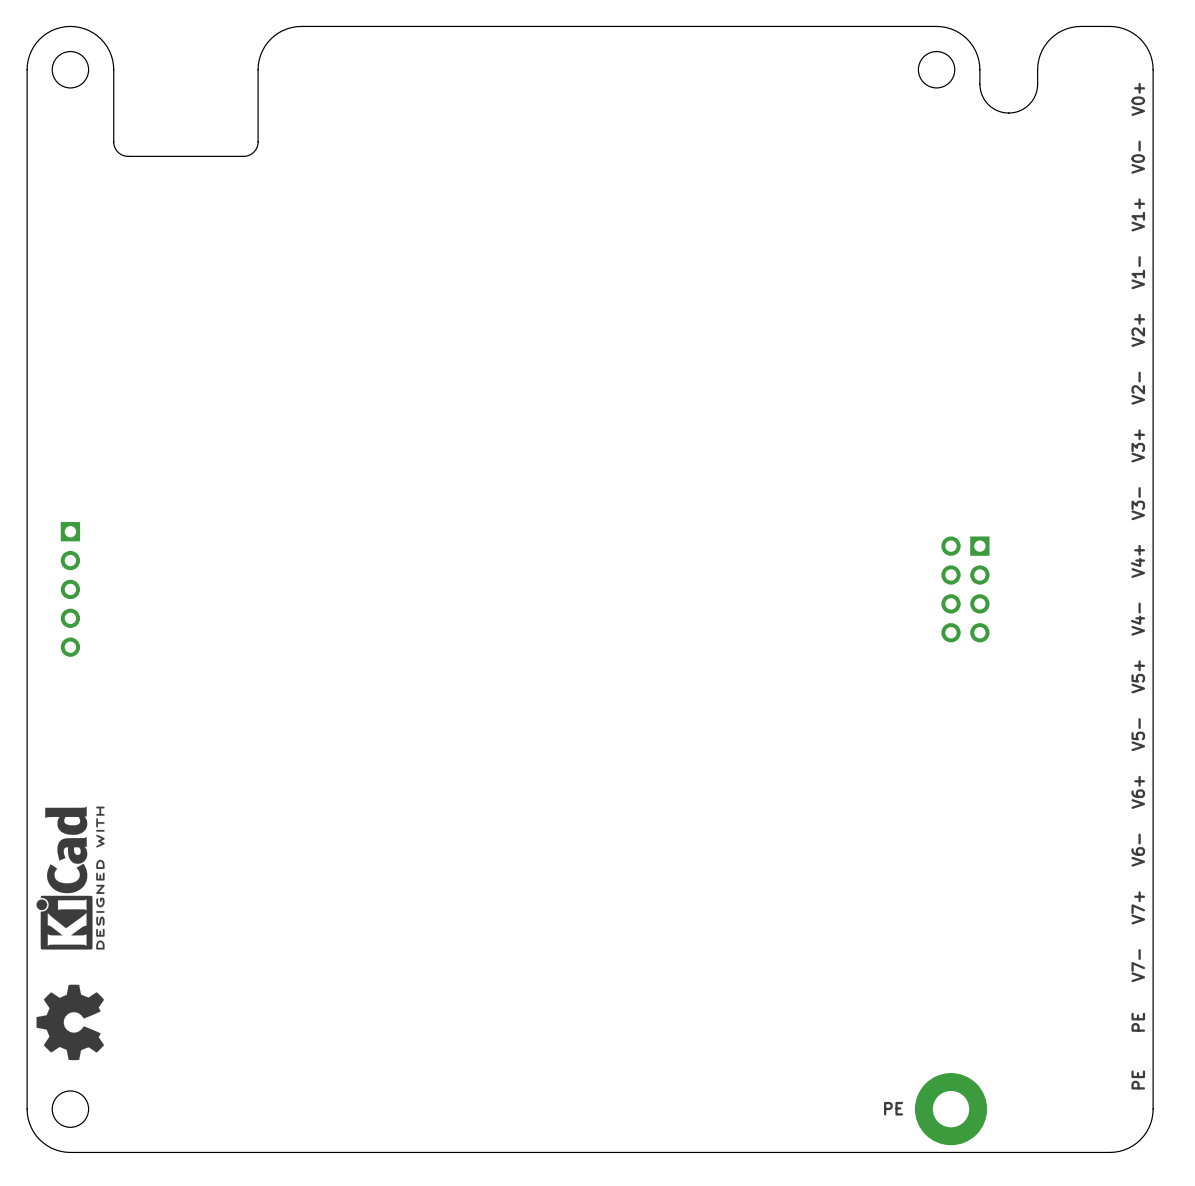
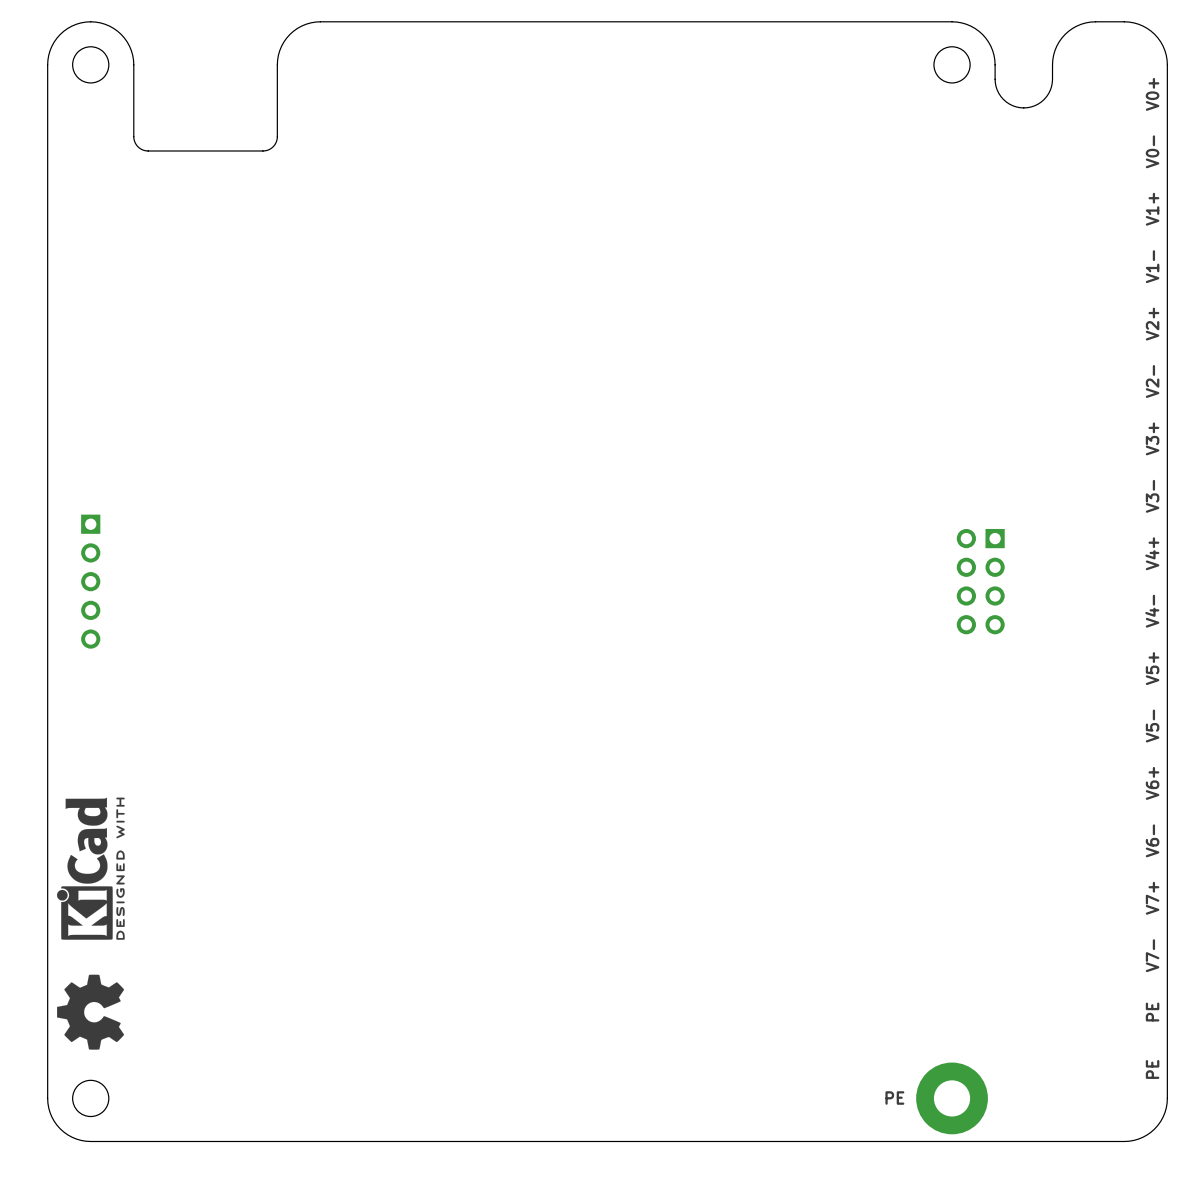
text position: PE (893, 1108) -> PE (894, 1098)
part position: (951, 1109) -> (952, 1098)

